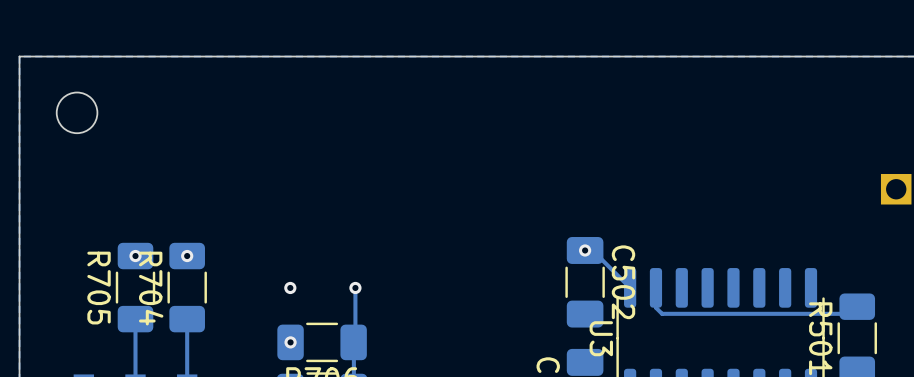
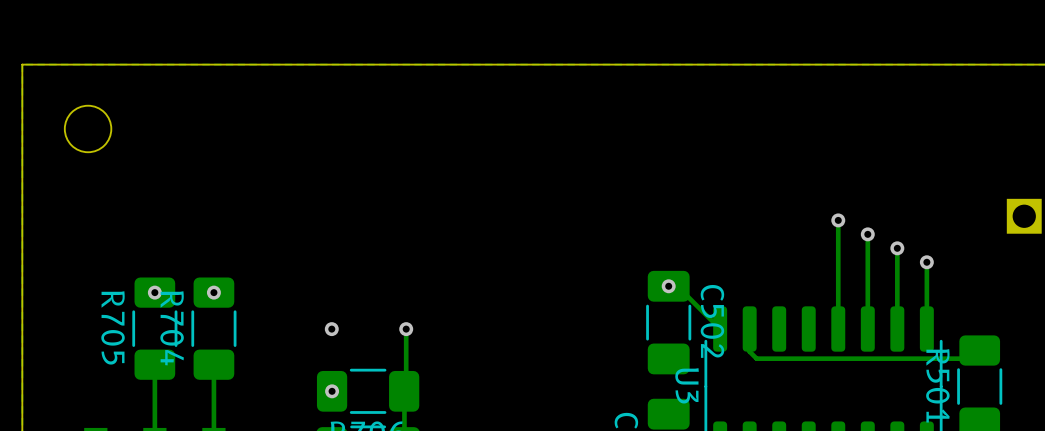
track: none -> (838, 220) (838, 329)
via: none -> (838, 220)
track: none -> (867, 234) (867, 329)
via: none -> (867, 234)
track: none -> (897, 248) (897, 329)
via: none -> (897, 248)
track: none -> (926, 262) (926, 329)
via: none -> (926, 262)

